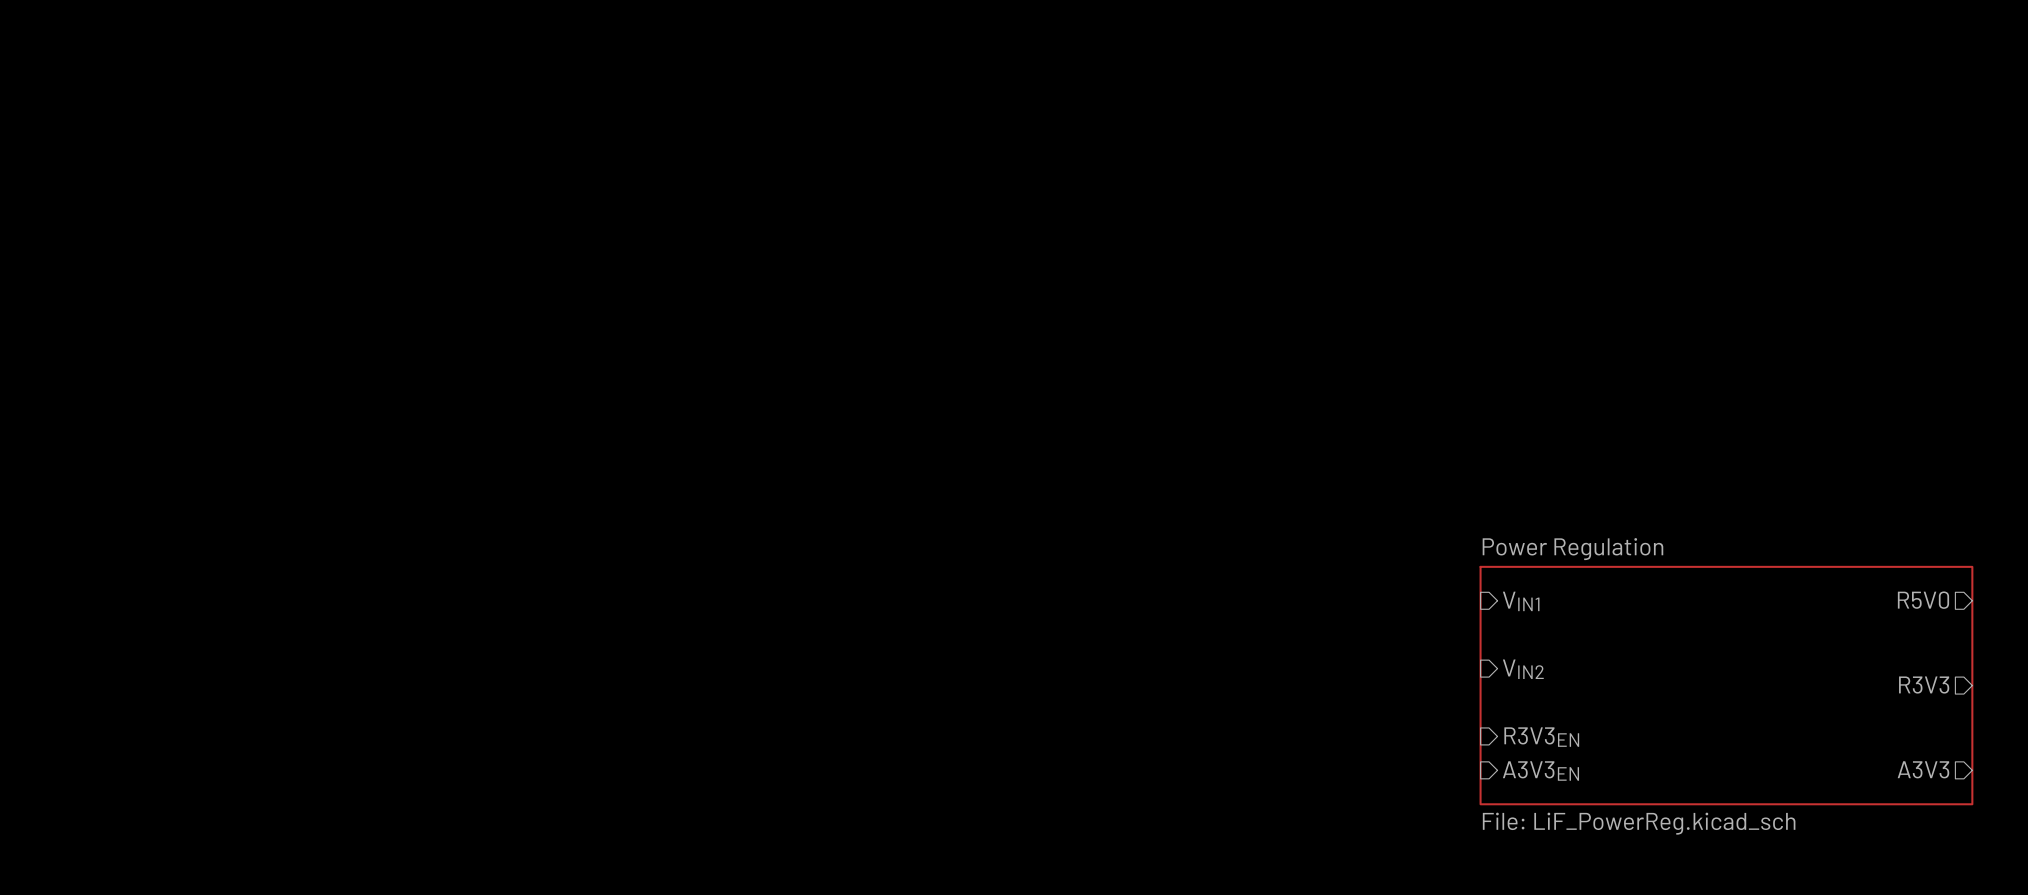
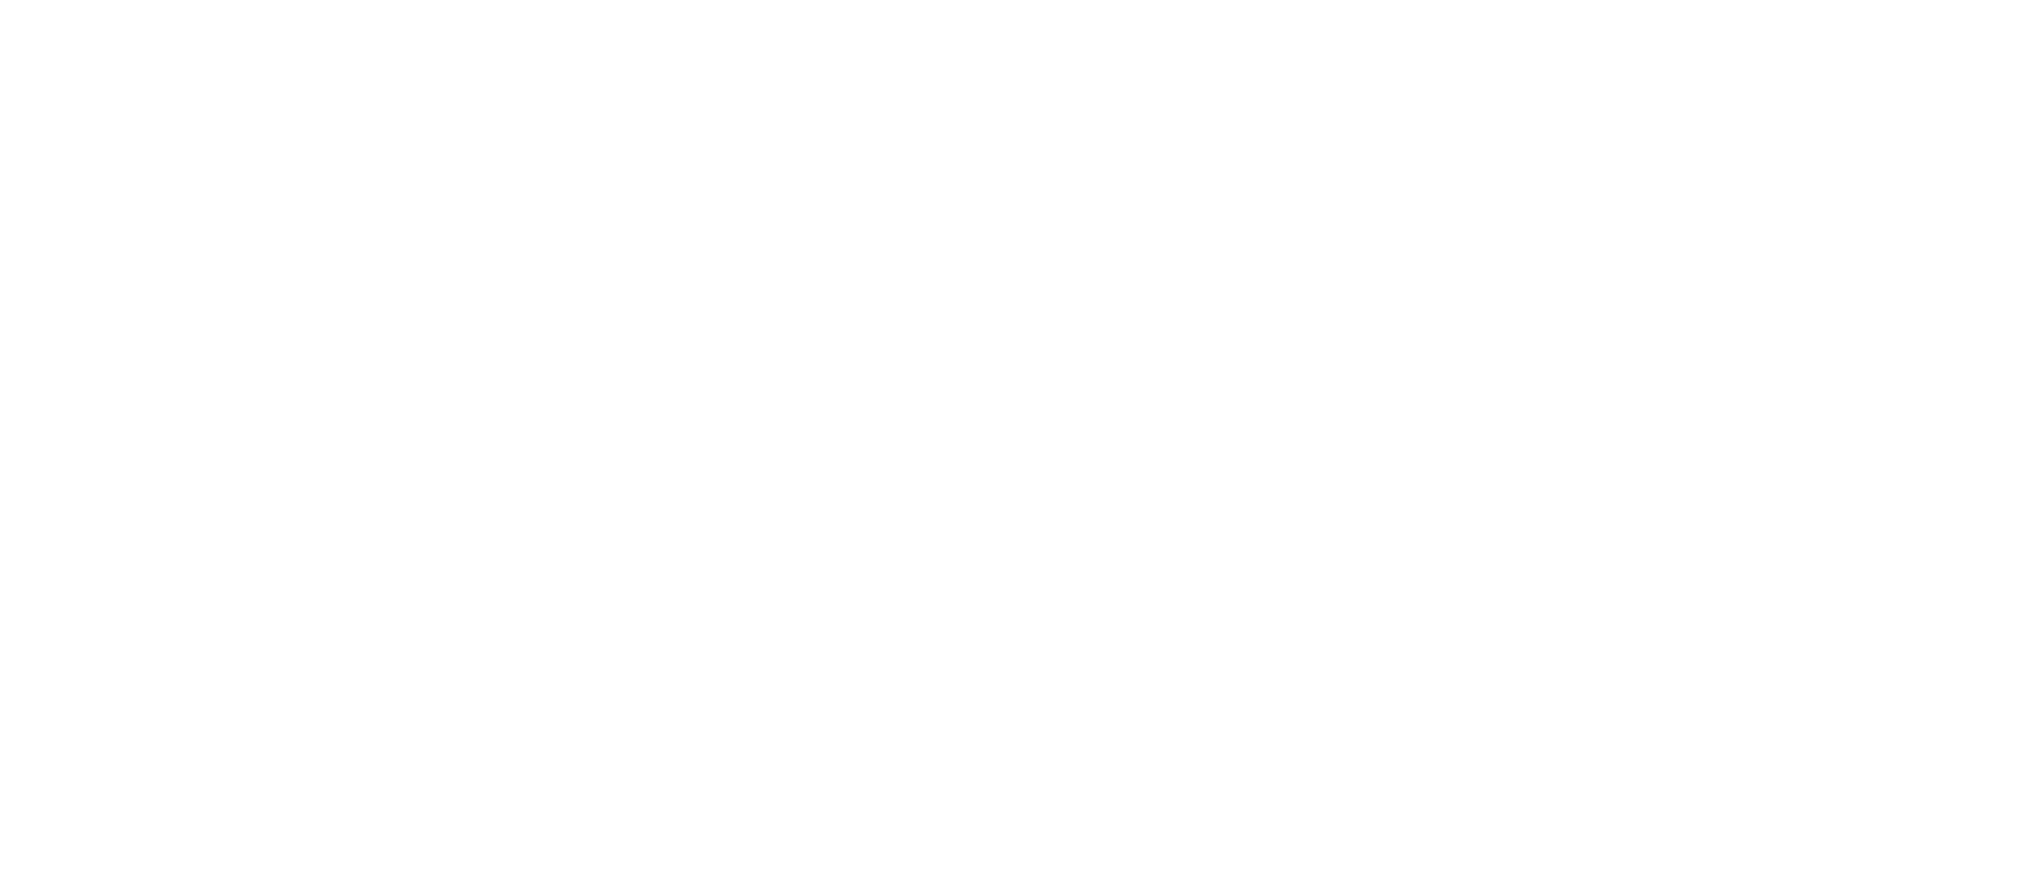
sheet pin: R5V0 (1923, 600) -> none
sheet pin: VIN1 (1521, 601) -> none
sheet pin: VIN2 (1523, 669) -> none
sheet Power Regulation: File: LiF_PowerReg.kicad_sch (1726, 685) -> none
sheet pin: R3V3 (1924, 685) -> none
sheet pin: R3V3EN (1541, 737) -> none
sheet pin: A3V3 (1923, 769) -> none
sheet pin: A3V3EN (1540, 770) -> none

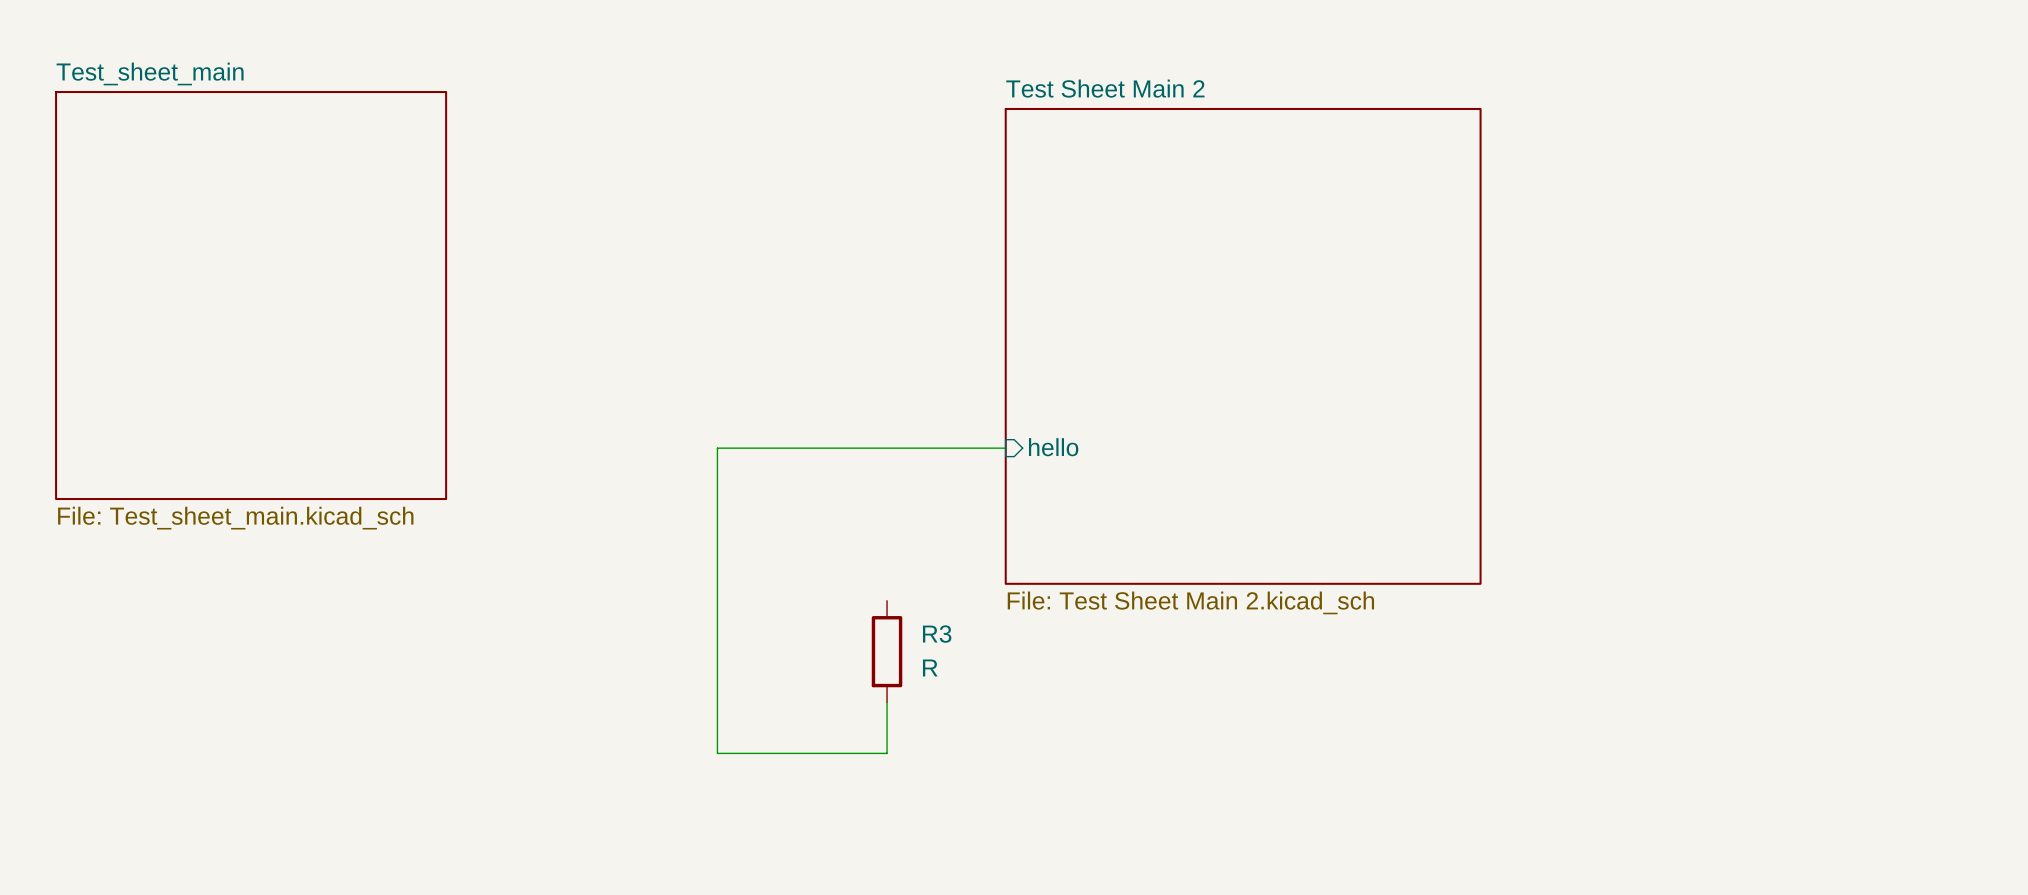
sheet Test_sheet_main: none -> File: Test_sheet_main.kicad_sch (251, 295)
sheet Test Sheet Main 2: none -> File: Test Sheet Main 2.kicad_sch (1243, 346)
sheet pin: none -> hello (1053, 447)
wire: none -> (1005, 448) (717, 448) (717, 753) (887, 753) (887, 702)
R3: none -> R (887, 651)

